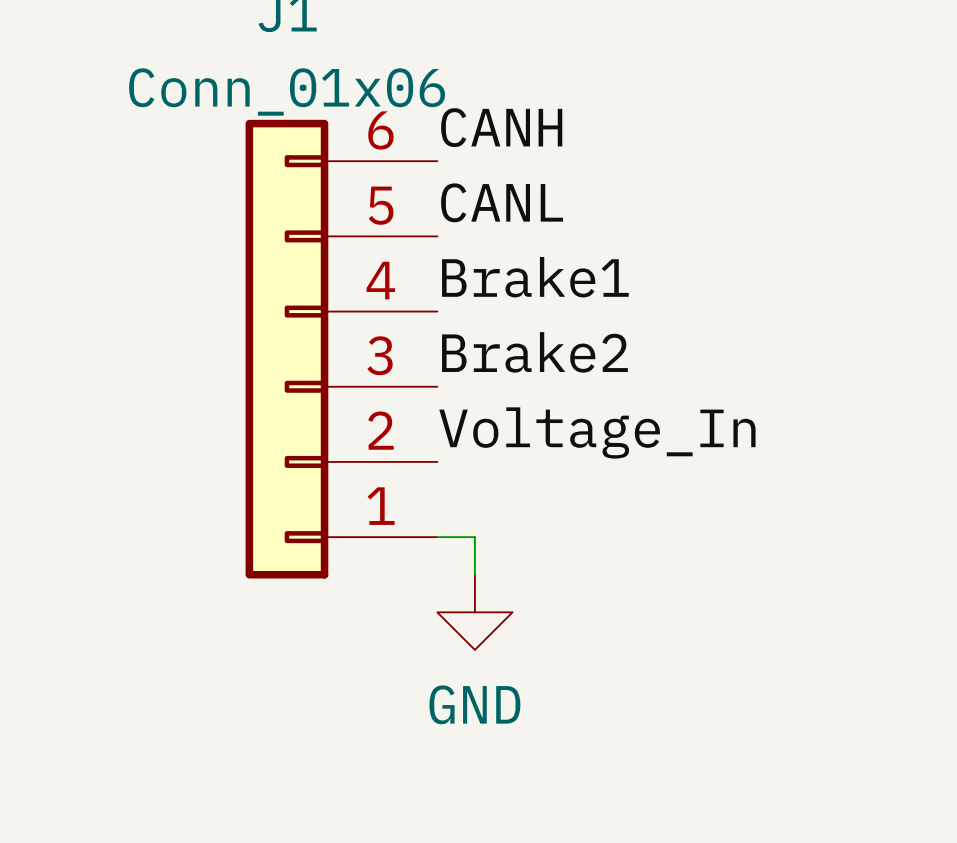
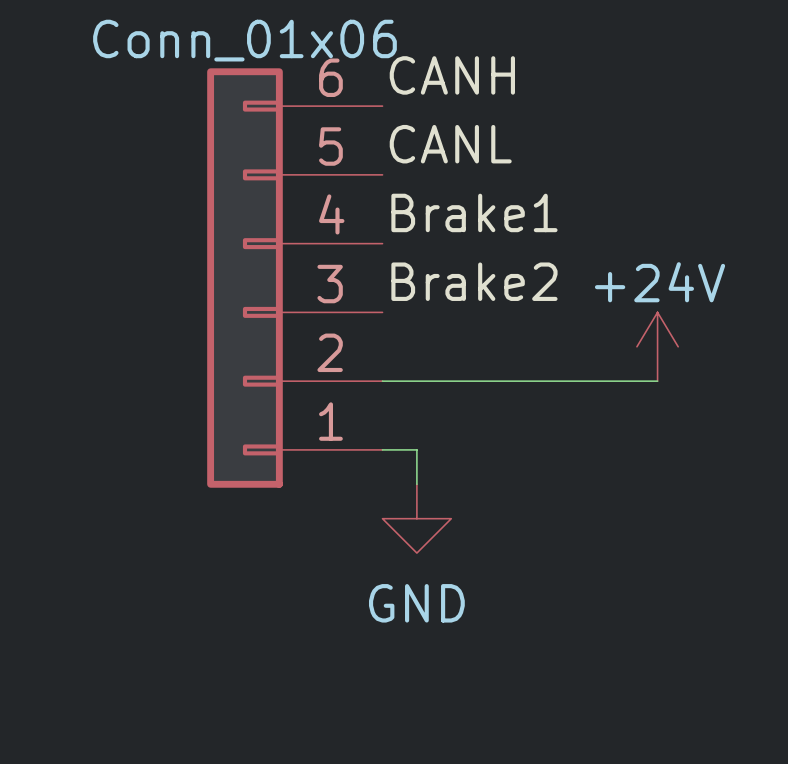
power symbol: none -> +24V (657, 346)
label: Voltage_In (597, 432) -> none
wire: none -> (382, 381) (657, 381)

